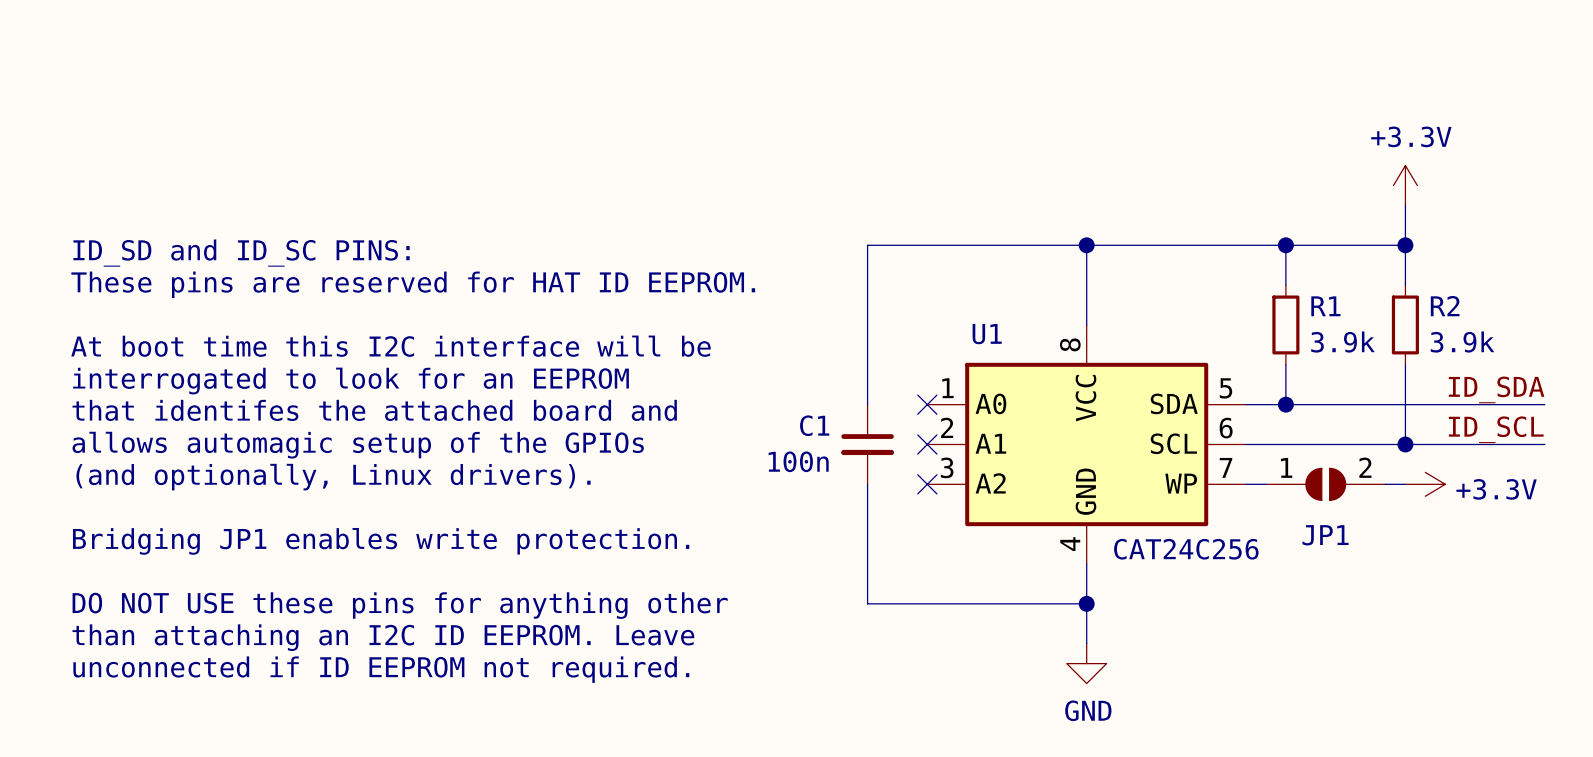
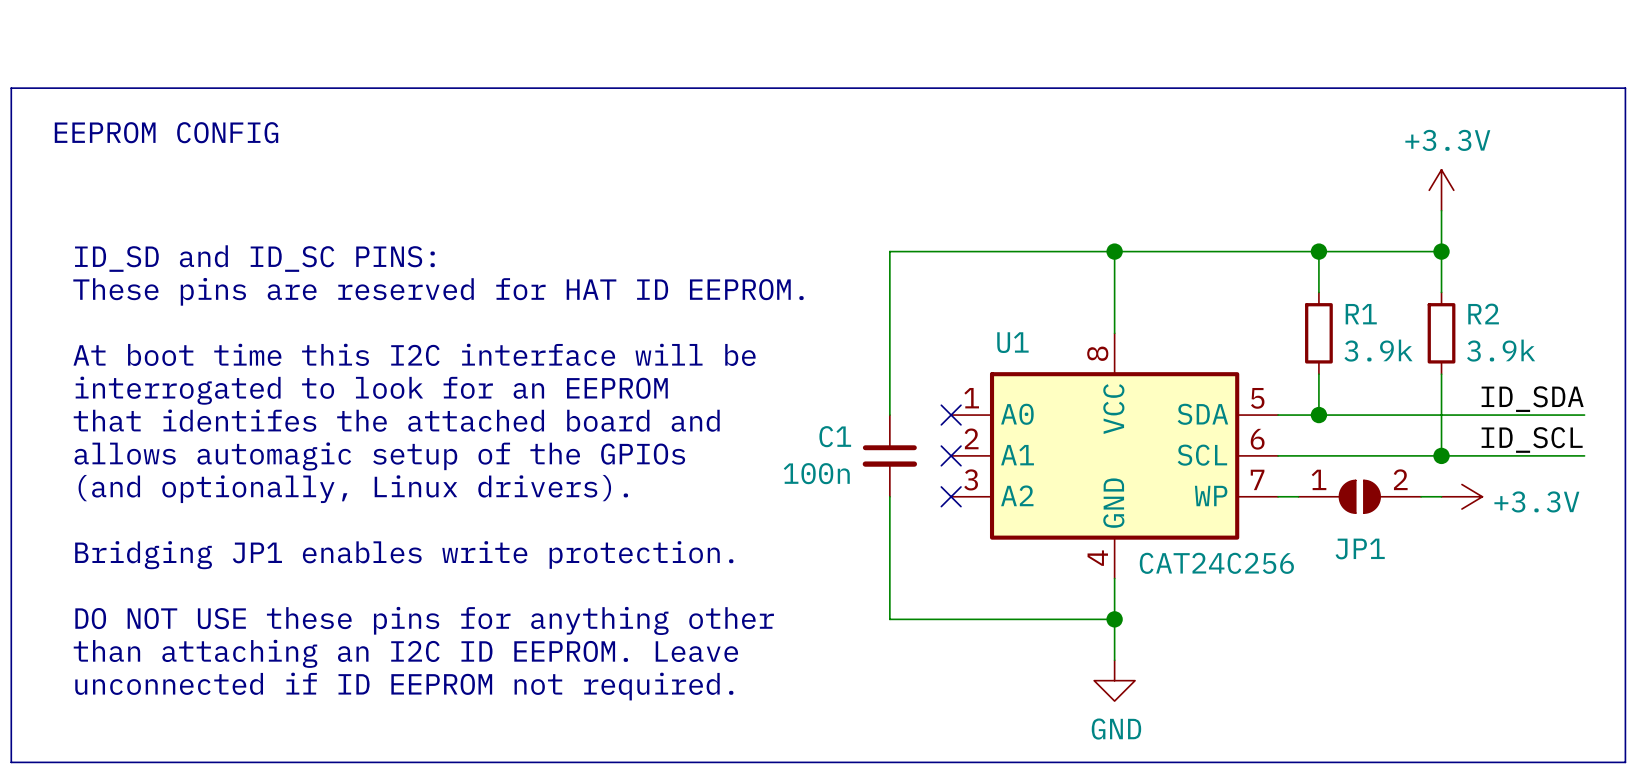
line: none -> (11, 88) (1625, 88) (1625, 762) (11, 762) (11, 88)
text: none -> EEPROM CONFIG (166, 132)

